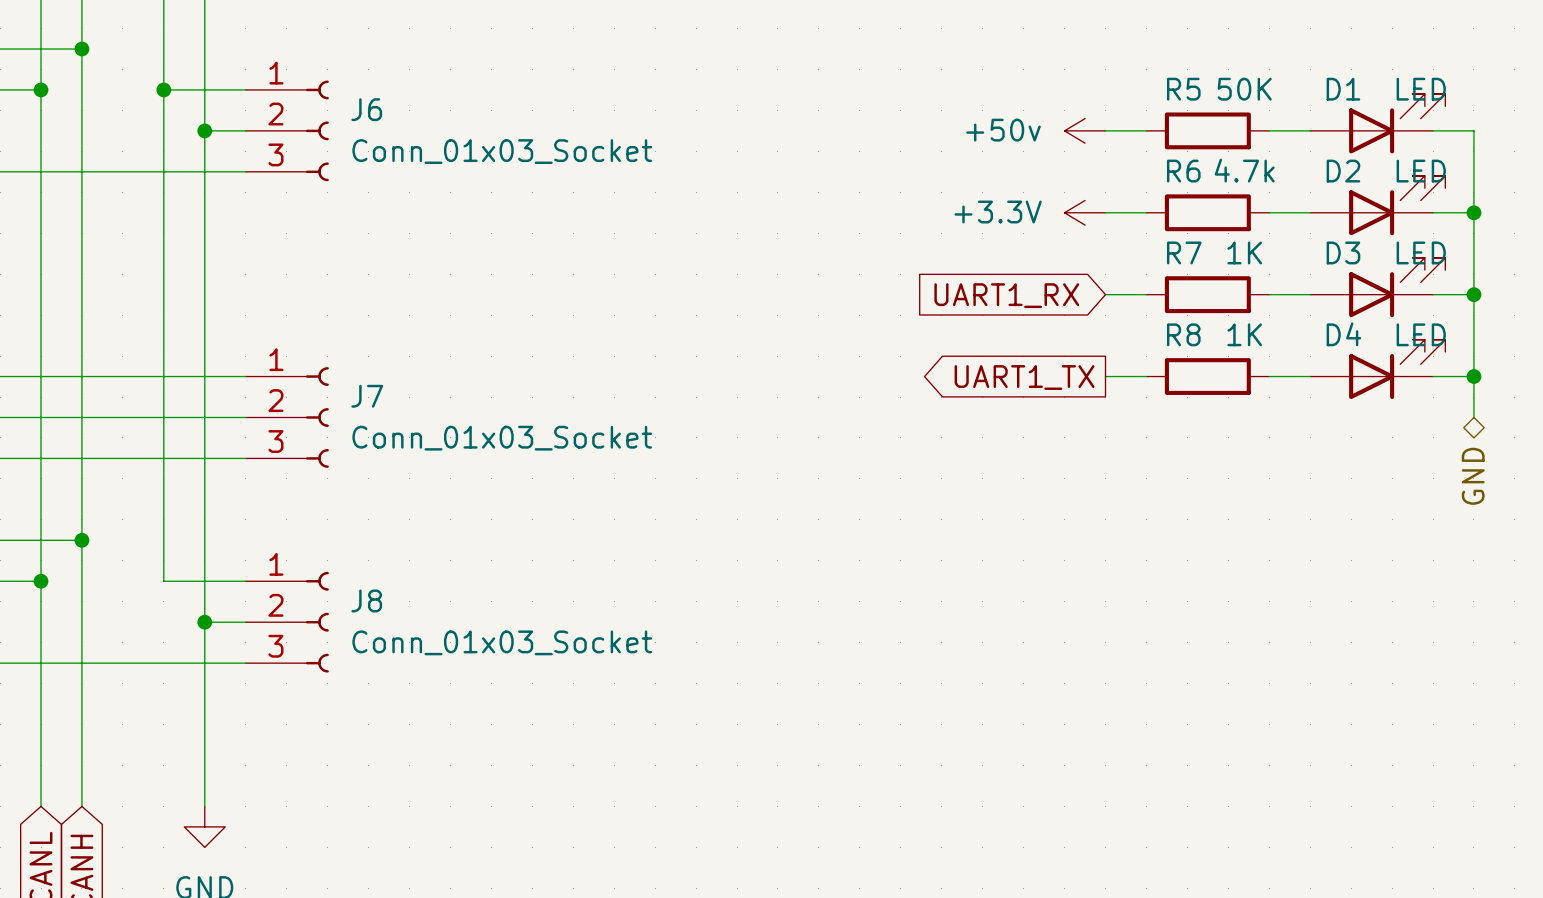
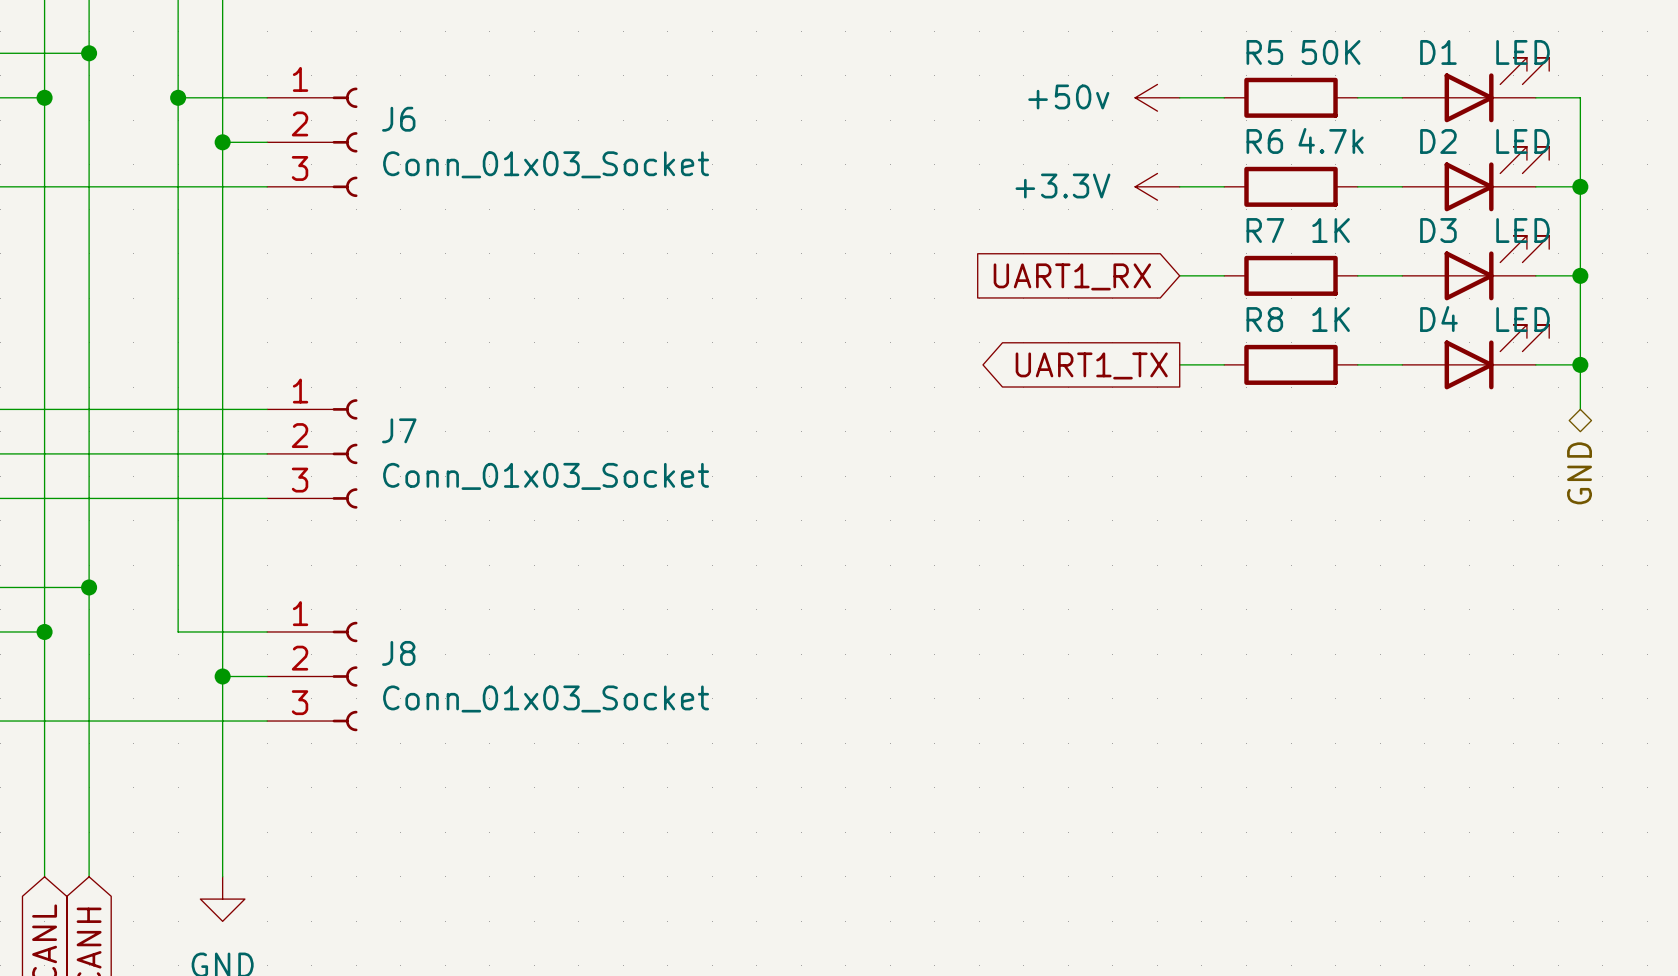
D1 position: (1377, 123) -> (1475, 90)
power symbol position: +50v (1085, 130) -> +50v (1157, 97)
wire: (1105, 130) (1146, 130) -> (1179, 97) (1224, 97)
R5 position: (1207, 130) -> (1291, 97)
wire: (1269, 130) (1310, 130) -> (1357, 97) (1402, 97)
wire: (1433, 130) (1473, 130) (1473, 417) -> (1535, 97) (1580, 97) (1580, 409)
junction: none -> (1580, 186)
D2 position: (1377, 205) -> (1475, 179)
power symbol position: +3.3V (1085, 212) -> +3.3V (1157, 186)
wire: (1105, 212) (1146, 212) -> (1179, 186) (1224, 186)
R6 position: (1207, 212) -> (1291, 186)
wire: (1269, 212) (1310, 212) -> (1357, 186) (1402, 186)
wire: (1433, 212) (1473, 212) -> (1535, 186) (1580, 186)
junction: (1473, 212) -> none
junction: none -> (1580, 275)
D3 position: (1377, 287) -> (1475, 268)
wire: (1105, 294) (1146, 294) -> (1179, 275) (1224, 275)
R7 position: (1207, 294) -> (1291, 275)
wire: (1269, 294) (1310, 294) -> (1357, 275) (1402, 275)
wire: (1433, 294) (1473, 294) -> (1535, 275) (1580, 275)
junction: (1473, 294) -> none
global label position: UART1_RX (1006, 295) -> UART1_RX (1072, 276)
junction: none -> (1580, 364)
D4 position: (1377, 369) -> (1475, 357)
wire: (1105, 376) (1146, 376) -> (1179, 364) (1224, 364)
R8 position: (1207, 376) -> (1291, 364)
wire: (1269, 376) (1310, 376) -> (1357, 364) (1402, 364)
wire: (1433, 376) (1473, 376) -> (1535, 364) (1580, 364)
junction: (1473, 376) -> none
global label position: UART1_TX (1024, 377) -> UART1_TX (1091, 365)
hierarchical label position: GND (1473, 476) -> GND (1579, 473)

